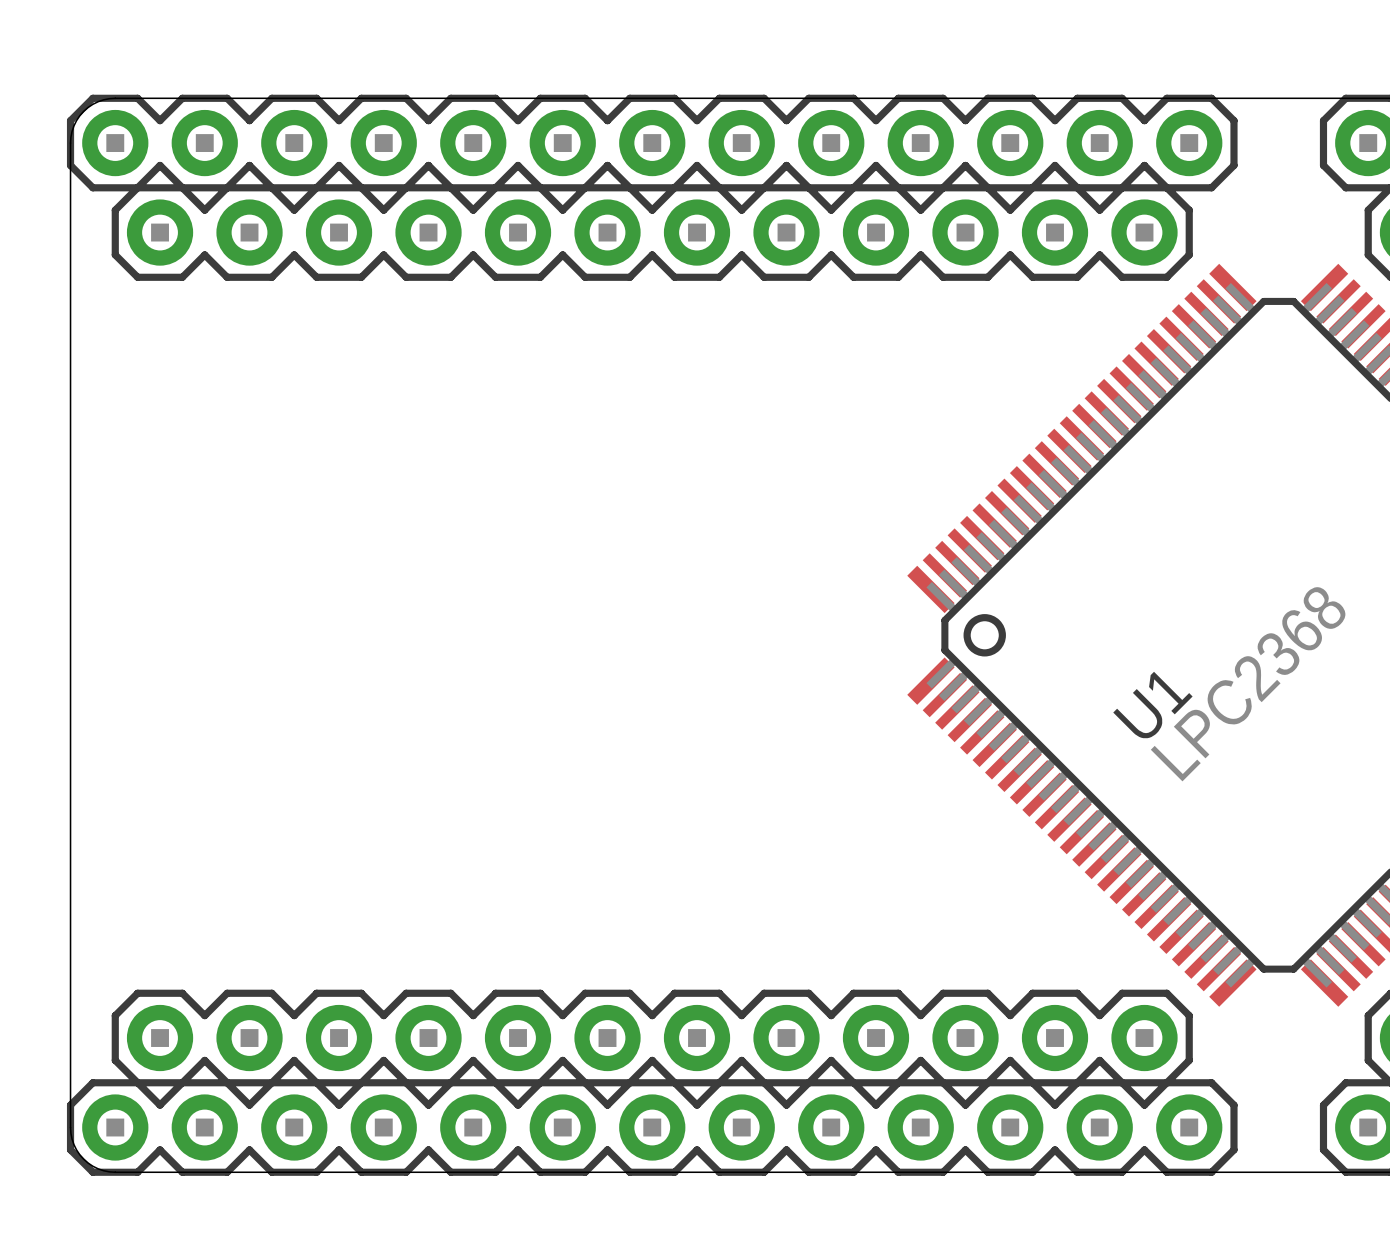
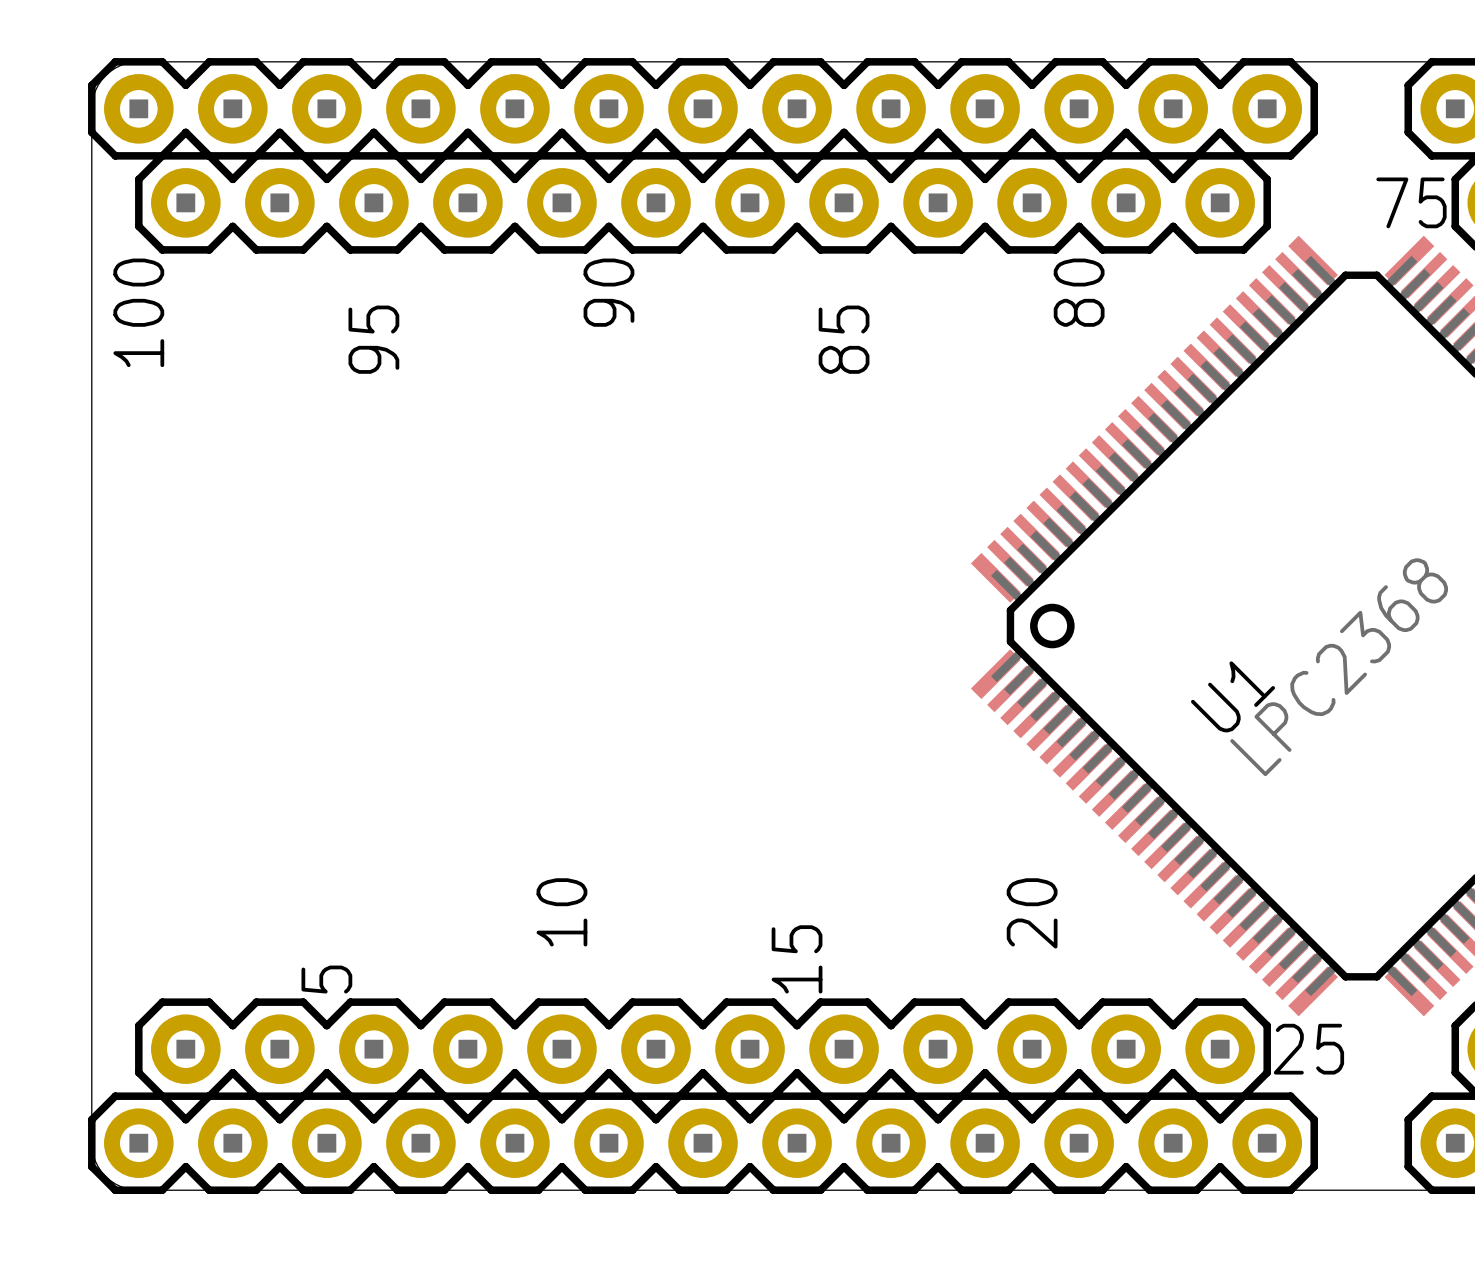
text: none -> 75 (1411, 202)
text: none -> 90 (608, 292)
text: none -> 80 (1079, 292)
text: none -> 100 (138, 312)
text: none -> 95 (373, 339)
text: none -> 85 (844, 339)
text: none -> 10 (561, 912)
text: none -> 20 (1032, 913)
text: none -> 15 (797, 959)
text: none -> 5 (326, 979)
text: none -> 25 (1308, 1049)

